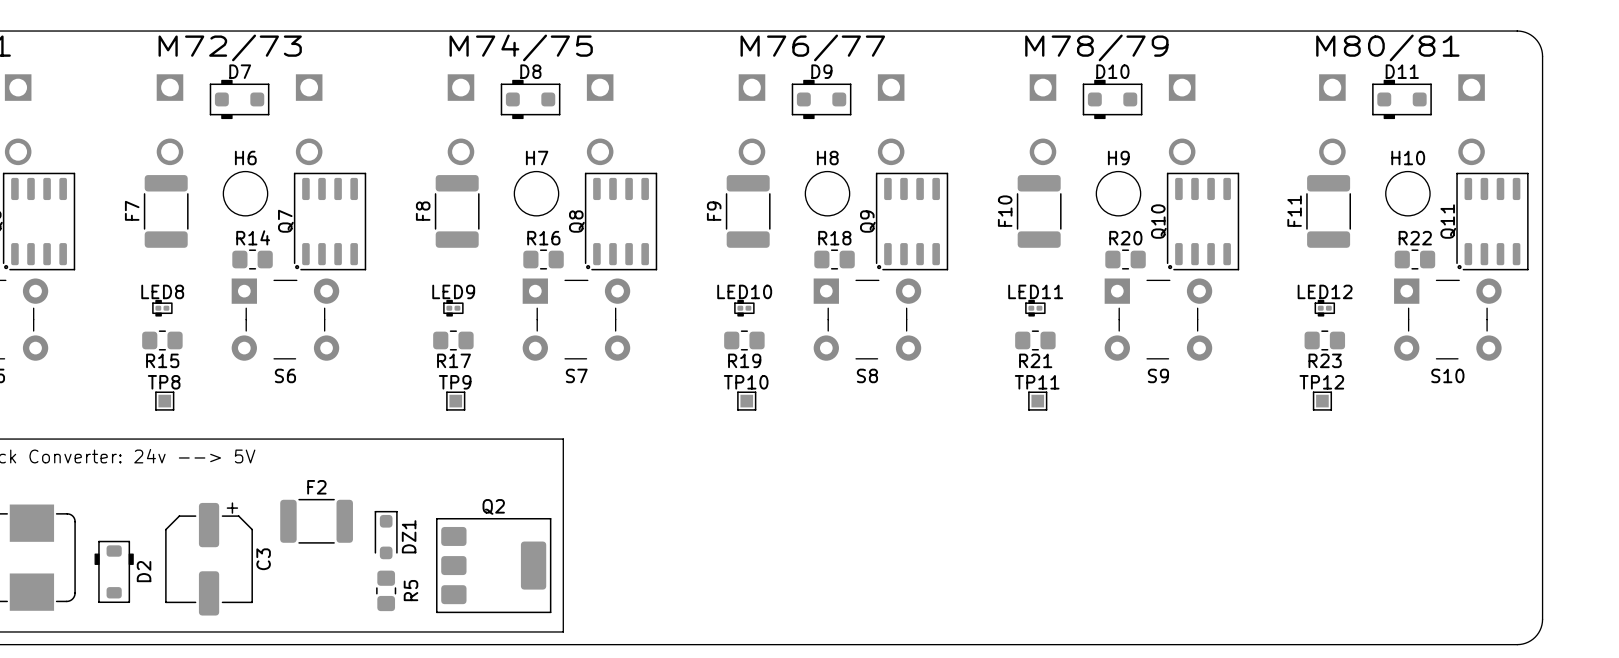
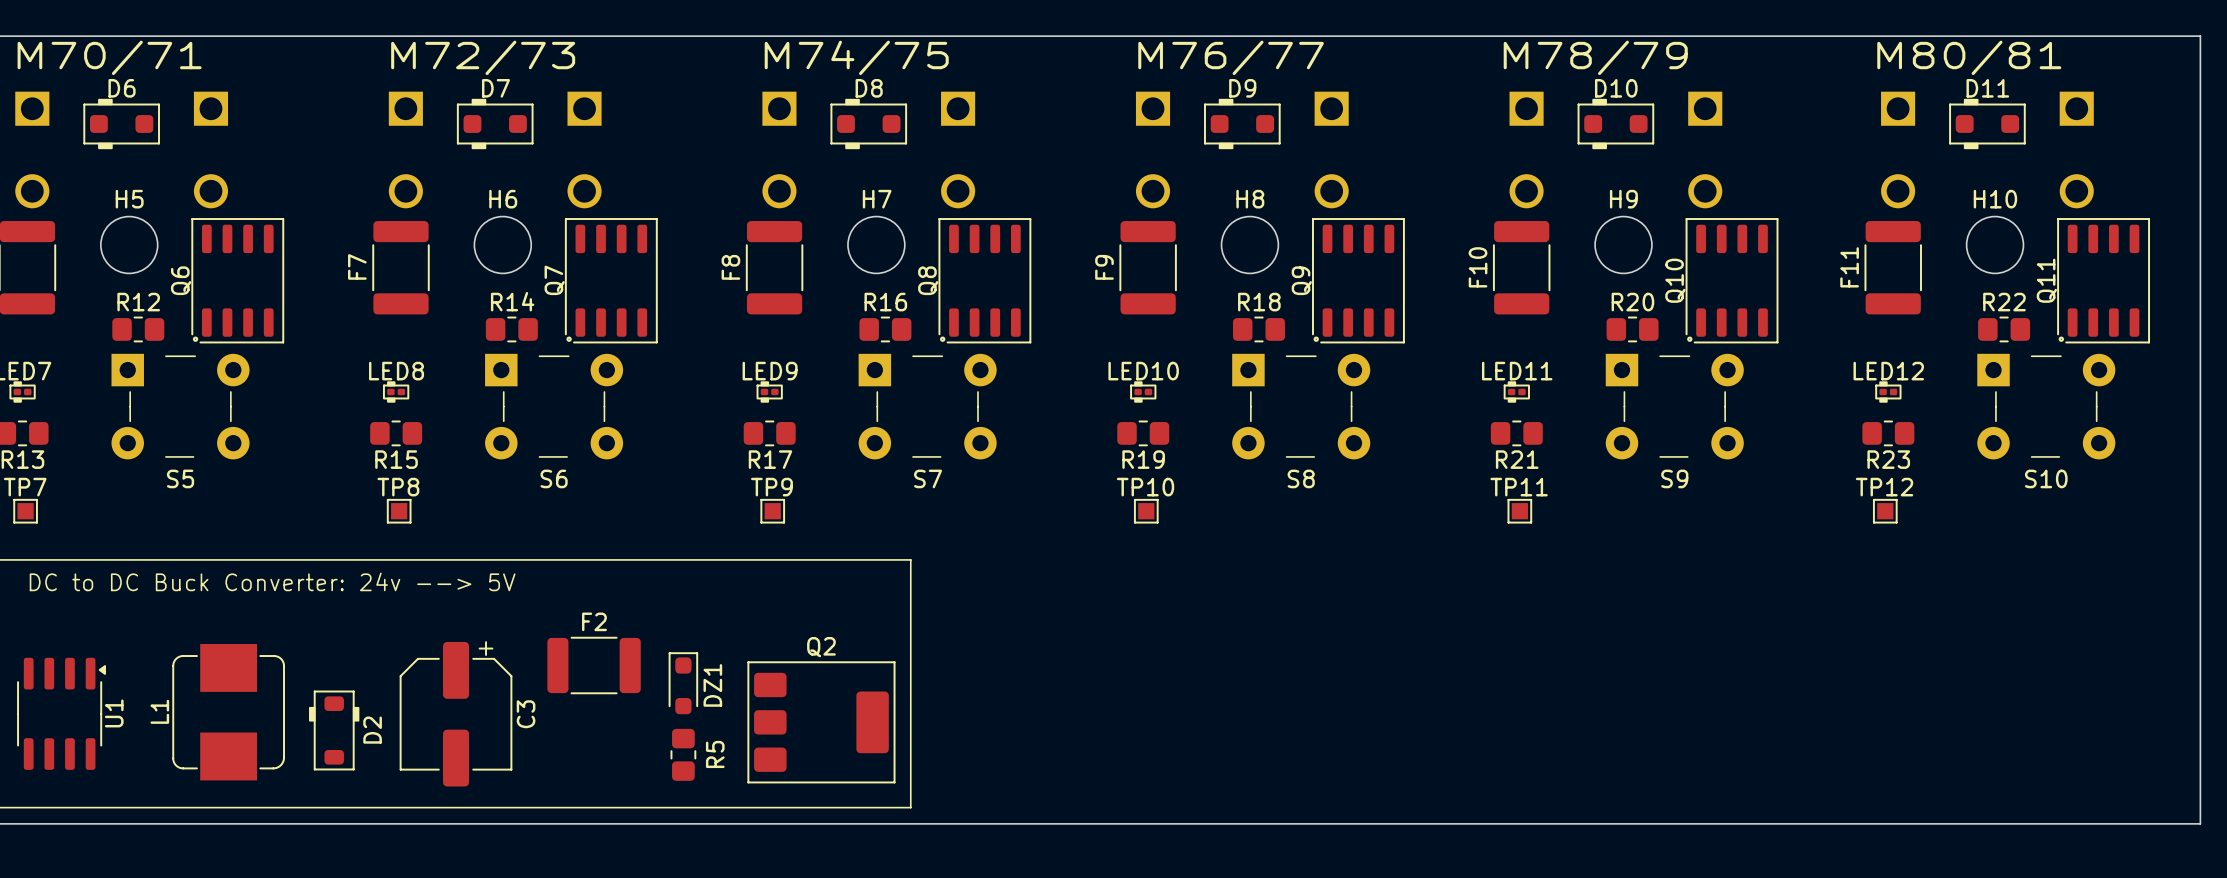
board edge: (1517, 31) (1525, 32) (1535, 38) (1540, 45) (1542, 56) (1542, 619) (1541, 627) (1535, 637) (1525, 643) (1517, 644) -> (2135, 36) (2200, 36) (2200, 823) (2135, 823)

